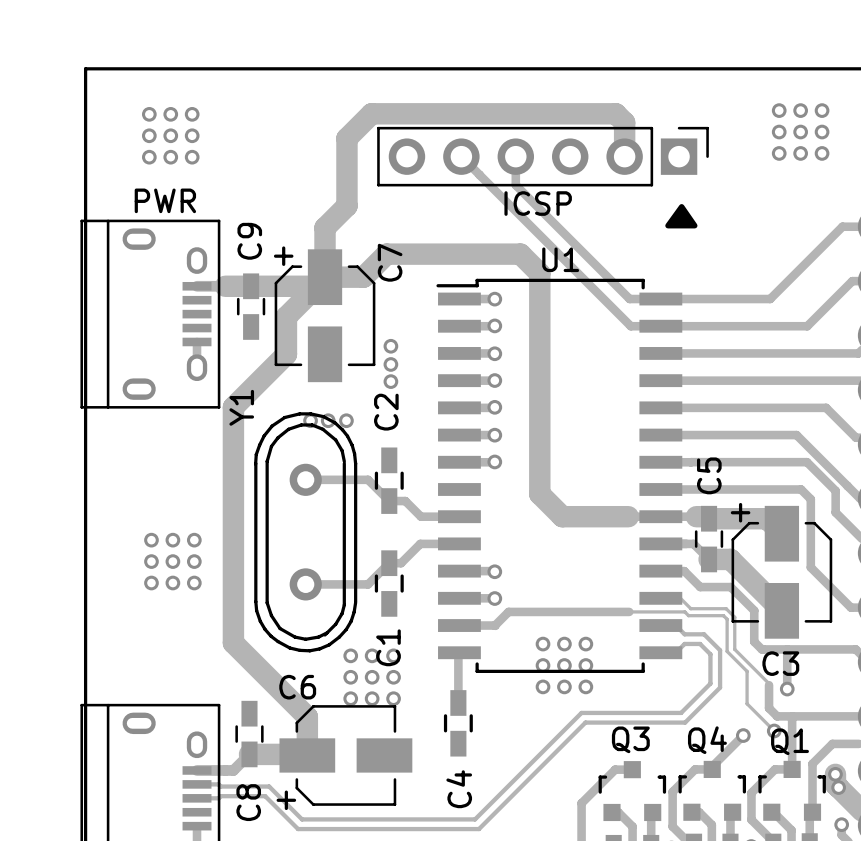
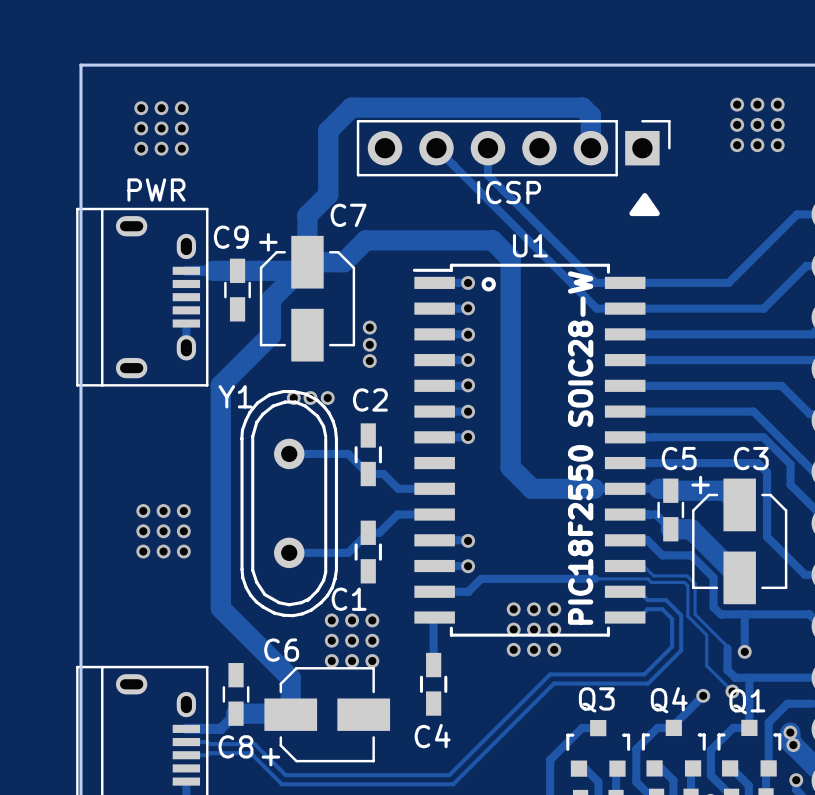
C9 name rotation: 0° (249, 241) -> 90° clockwise (231, 237)
C7 name rotation: 0° (390, 262) -> 90° clockwise (348, 215)
drawing: none -> [481, 277, 496, 292]
Y1 name rotation: 0° (241, 407) -> 90° clockwise (235, 396)
C2 name rotation: 0° (386, 412) -> 90° clockwise (370, 399)
text: none -> PIC18F2550 SOIC28-W (580, 448)
C5 name rotation: 0° (709, 475) -> 90° clockwise (679, 458)
C1 name rotation: 0° (388, 647) -> 90° clockwise (349, 599)
C3 name position: C3 (780, 663) -> C3 (751, 458)
C4 name rotation: 0° (459, 789) -> 90° clockwise (432, 736)
C8 name rotation: 0° (248, 802) -> 90° clockwise (236, 746)

